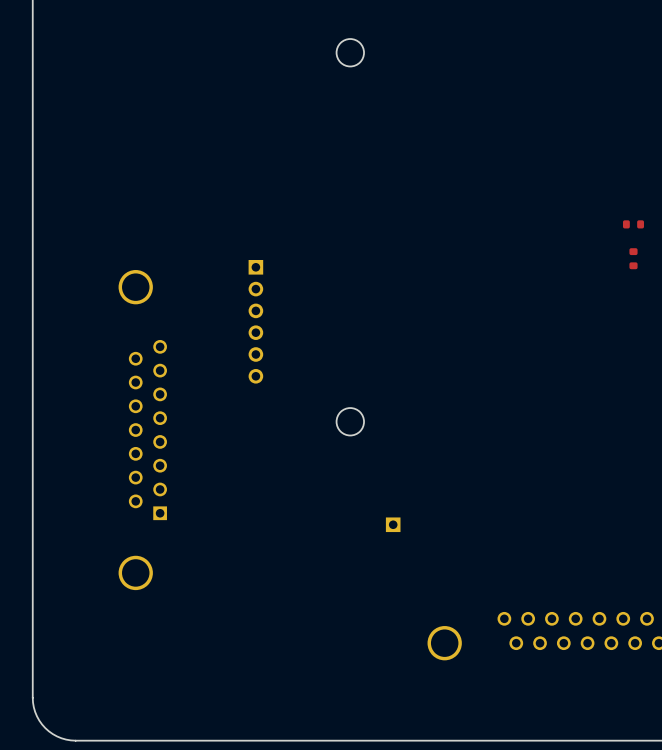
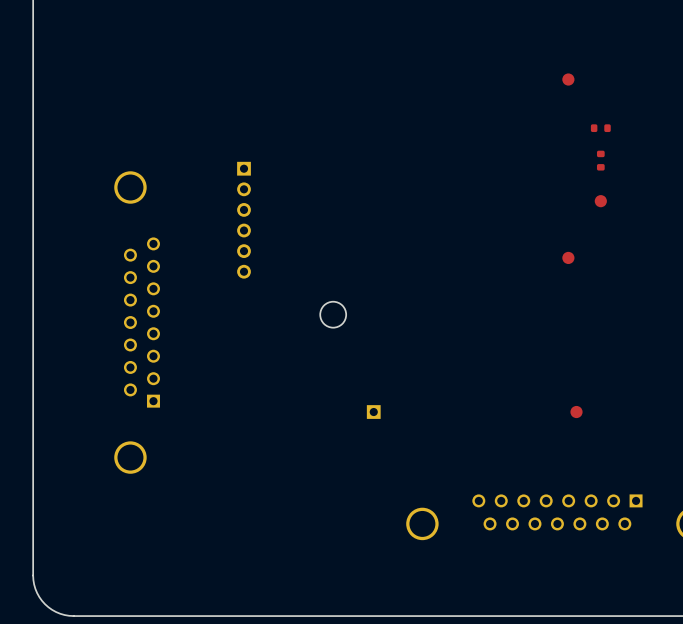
part: none -> (568, 79)
part: none -> (600, 201)
part: none -> (568, 257)
part: none -> (576, 412)

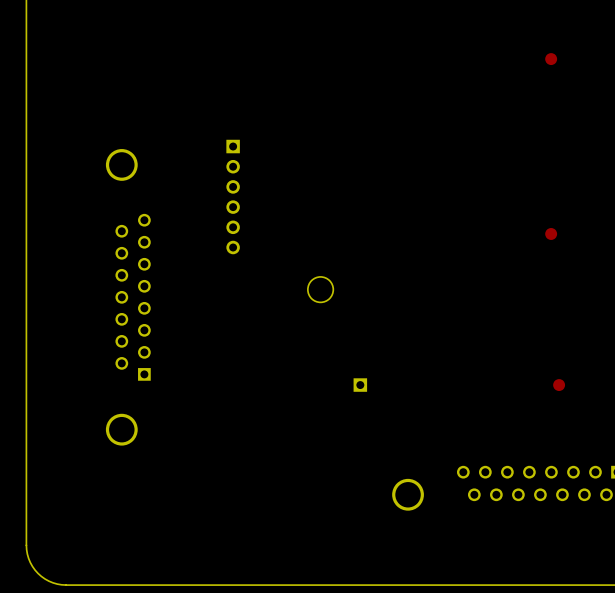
part: (600, 128) -> none
part: (600, 160) -> none
part: (600, 201) -> none

